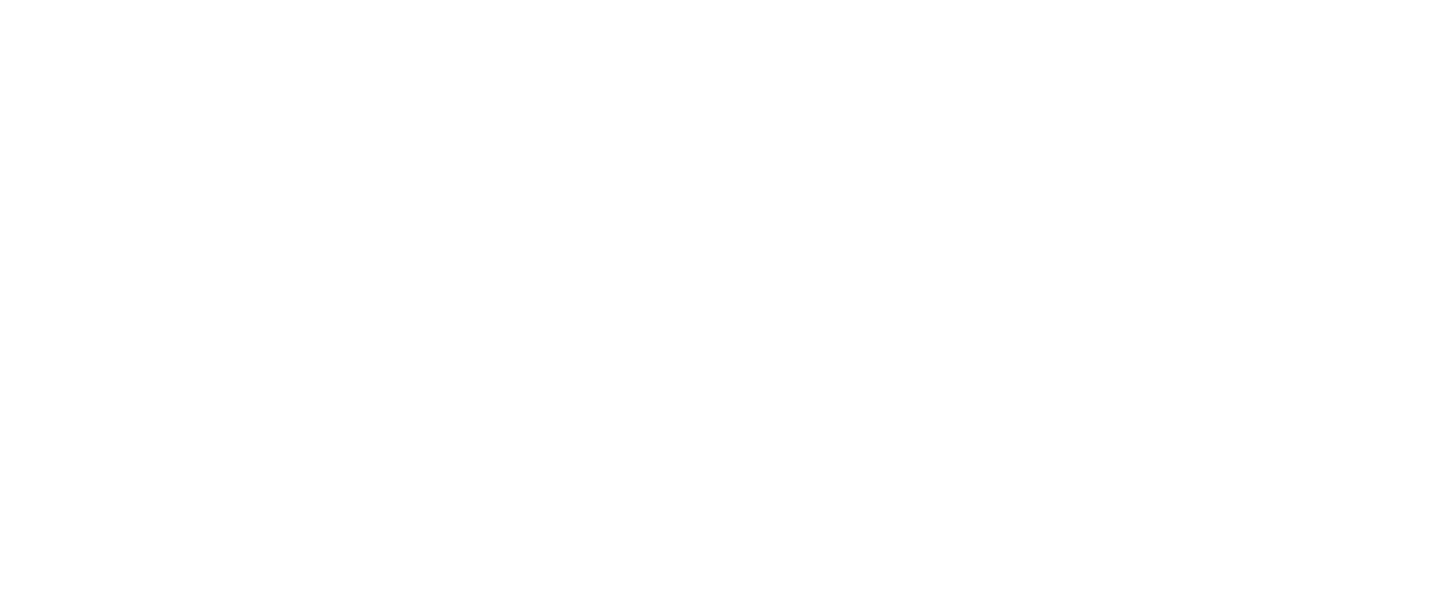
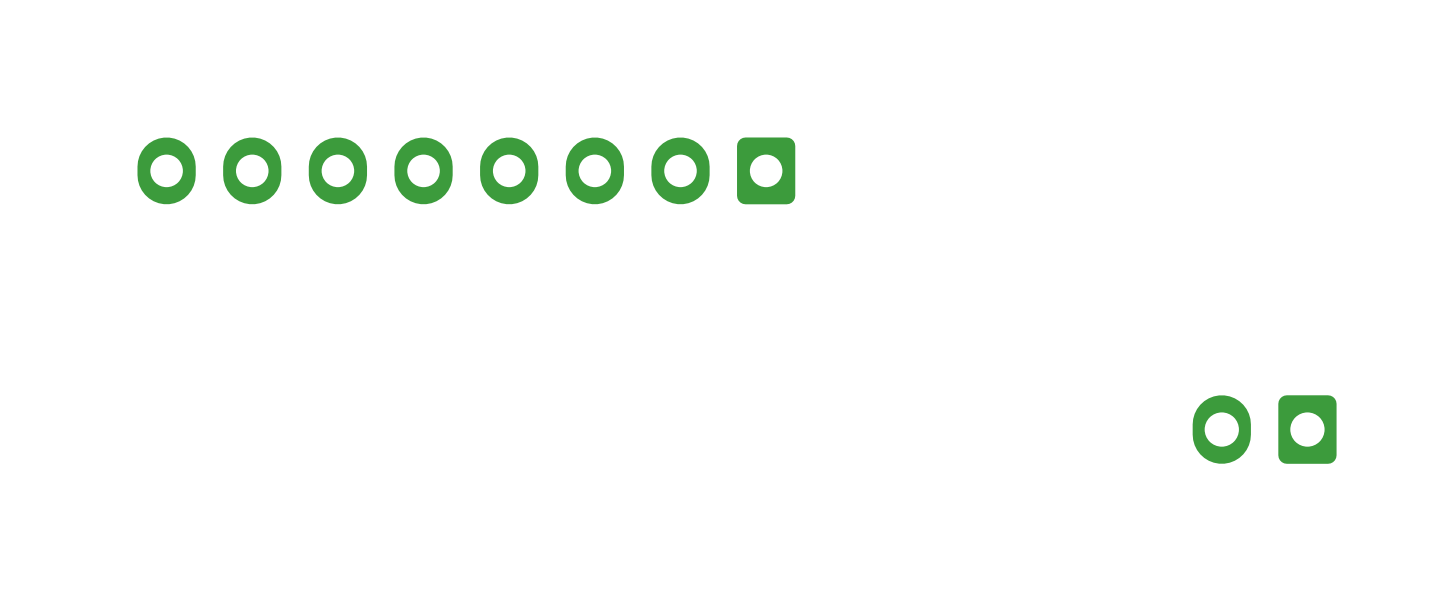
part: none -> (466, 170)
part: none -> (1264, 429)

